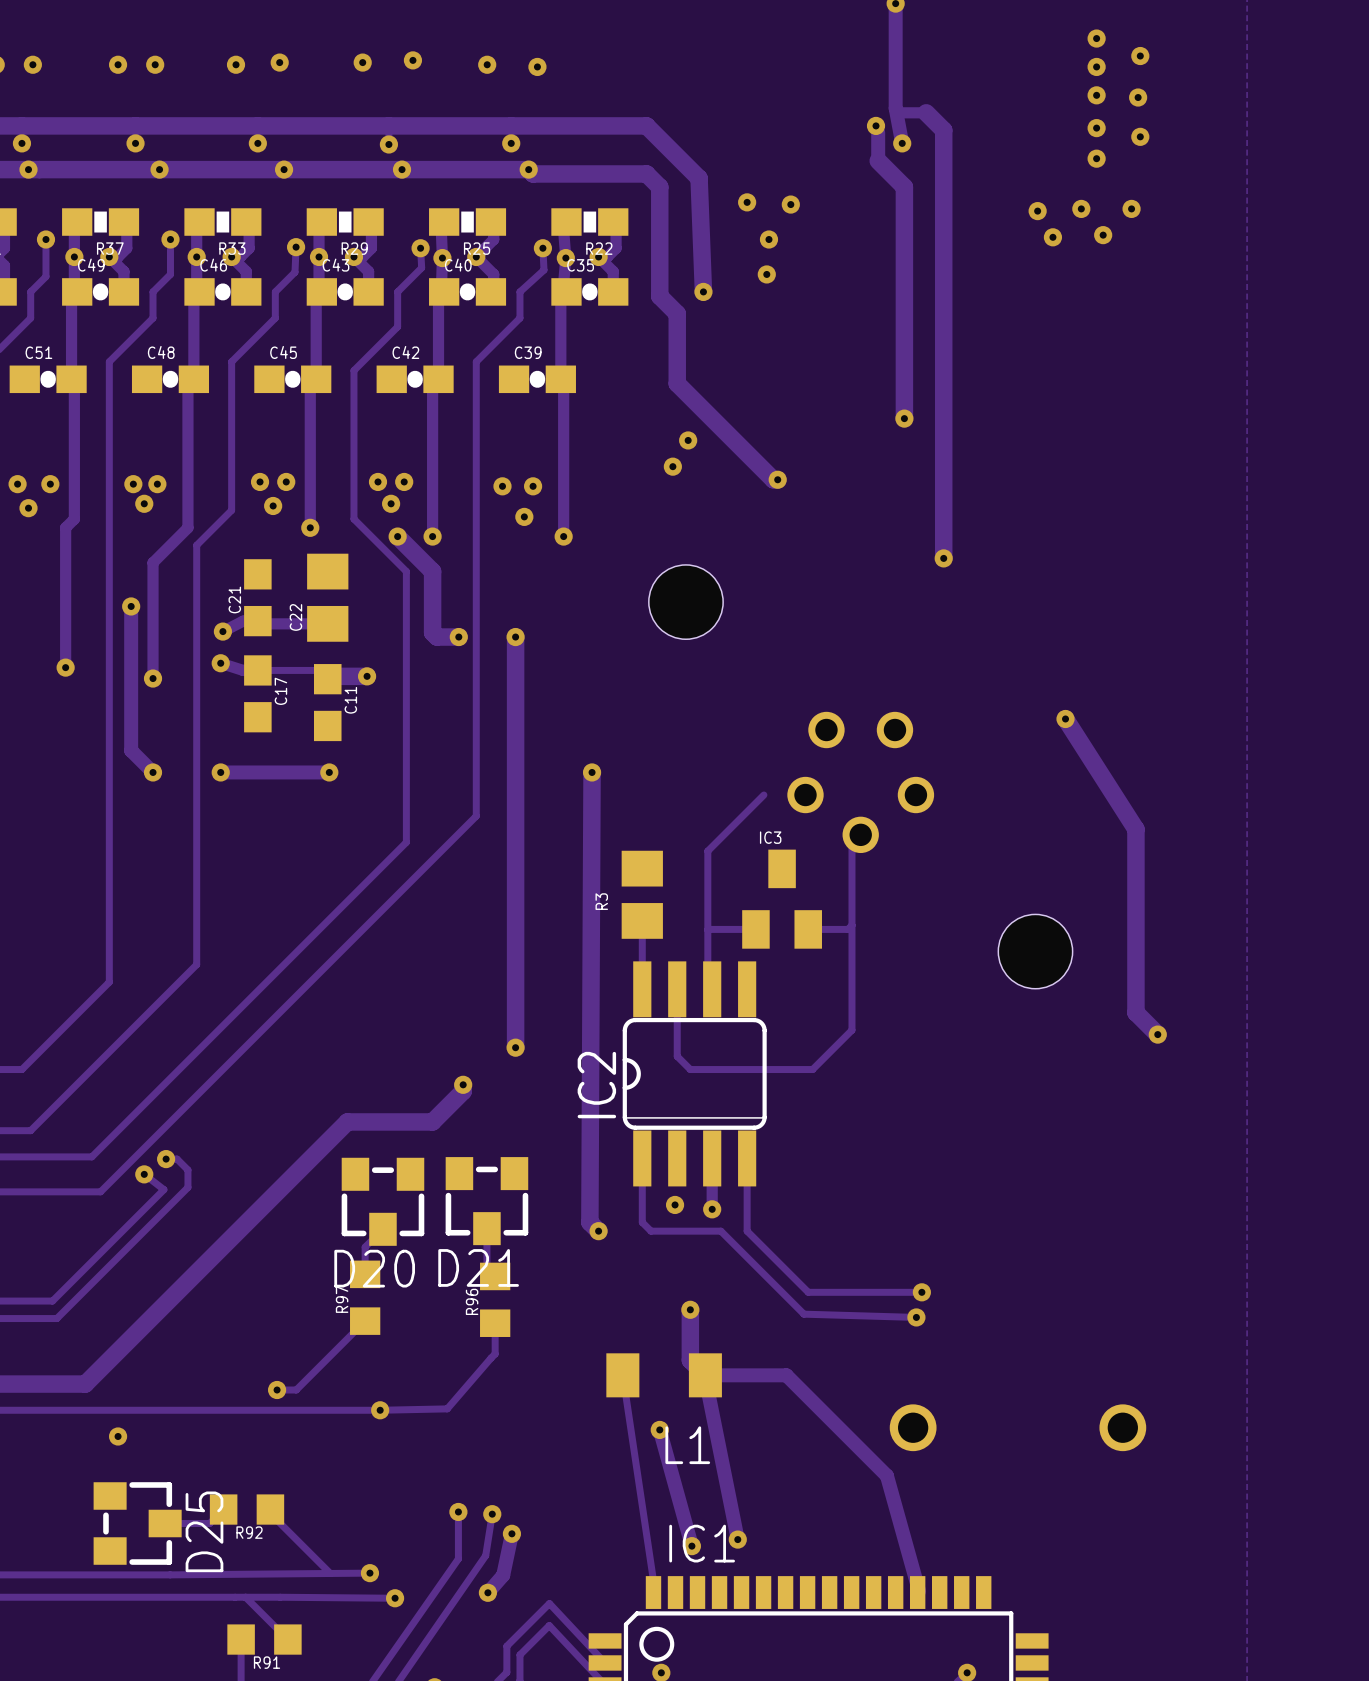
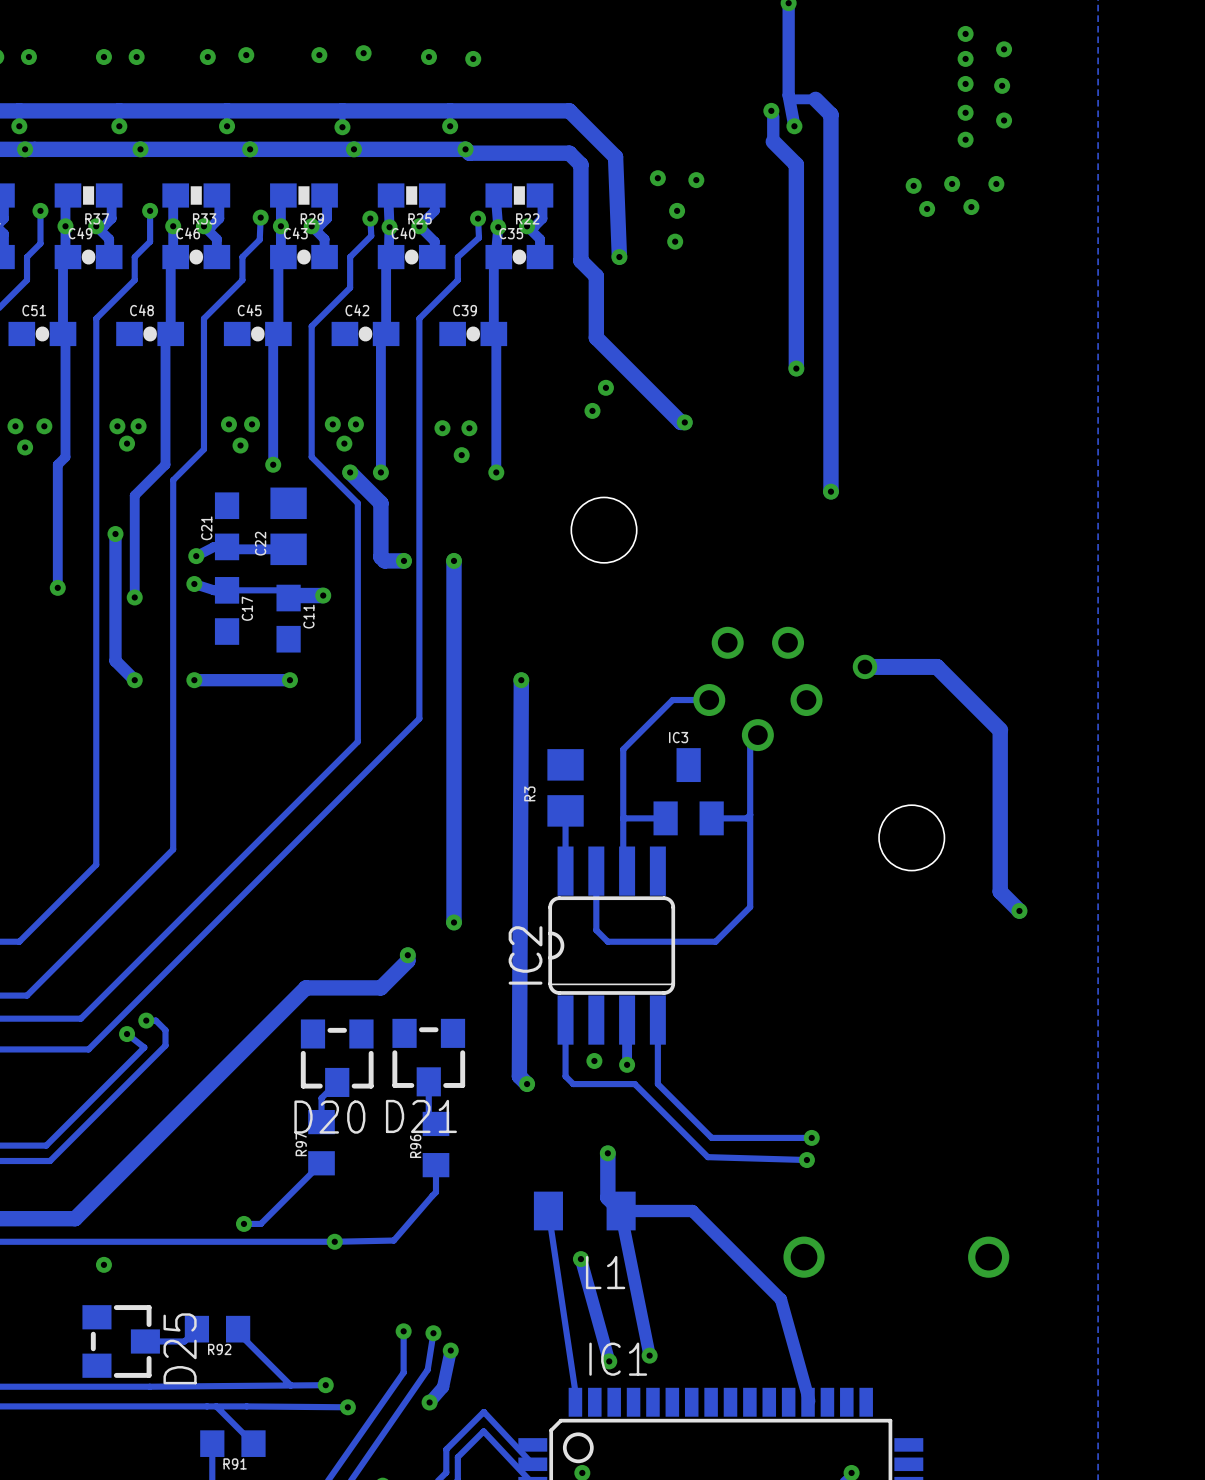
track: (1065, 718) (1135, 829) -> (864, 666) (936, 666) (1000, 730)
via: (1065, 718) -> none
via: none -> (864, 666)
track: none -> (709, 700) (672, 700)

